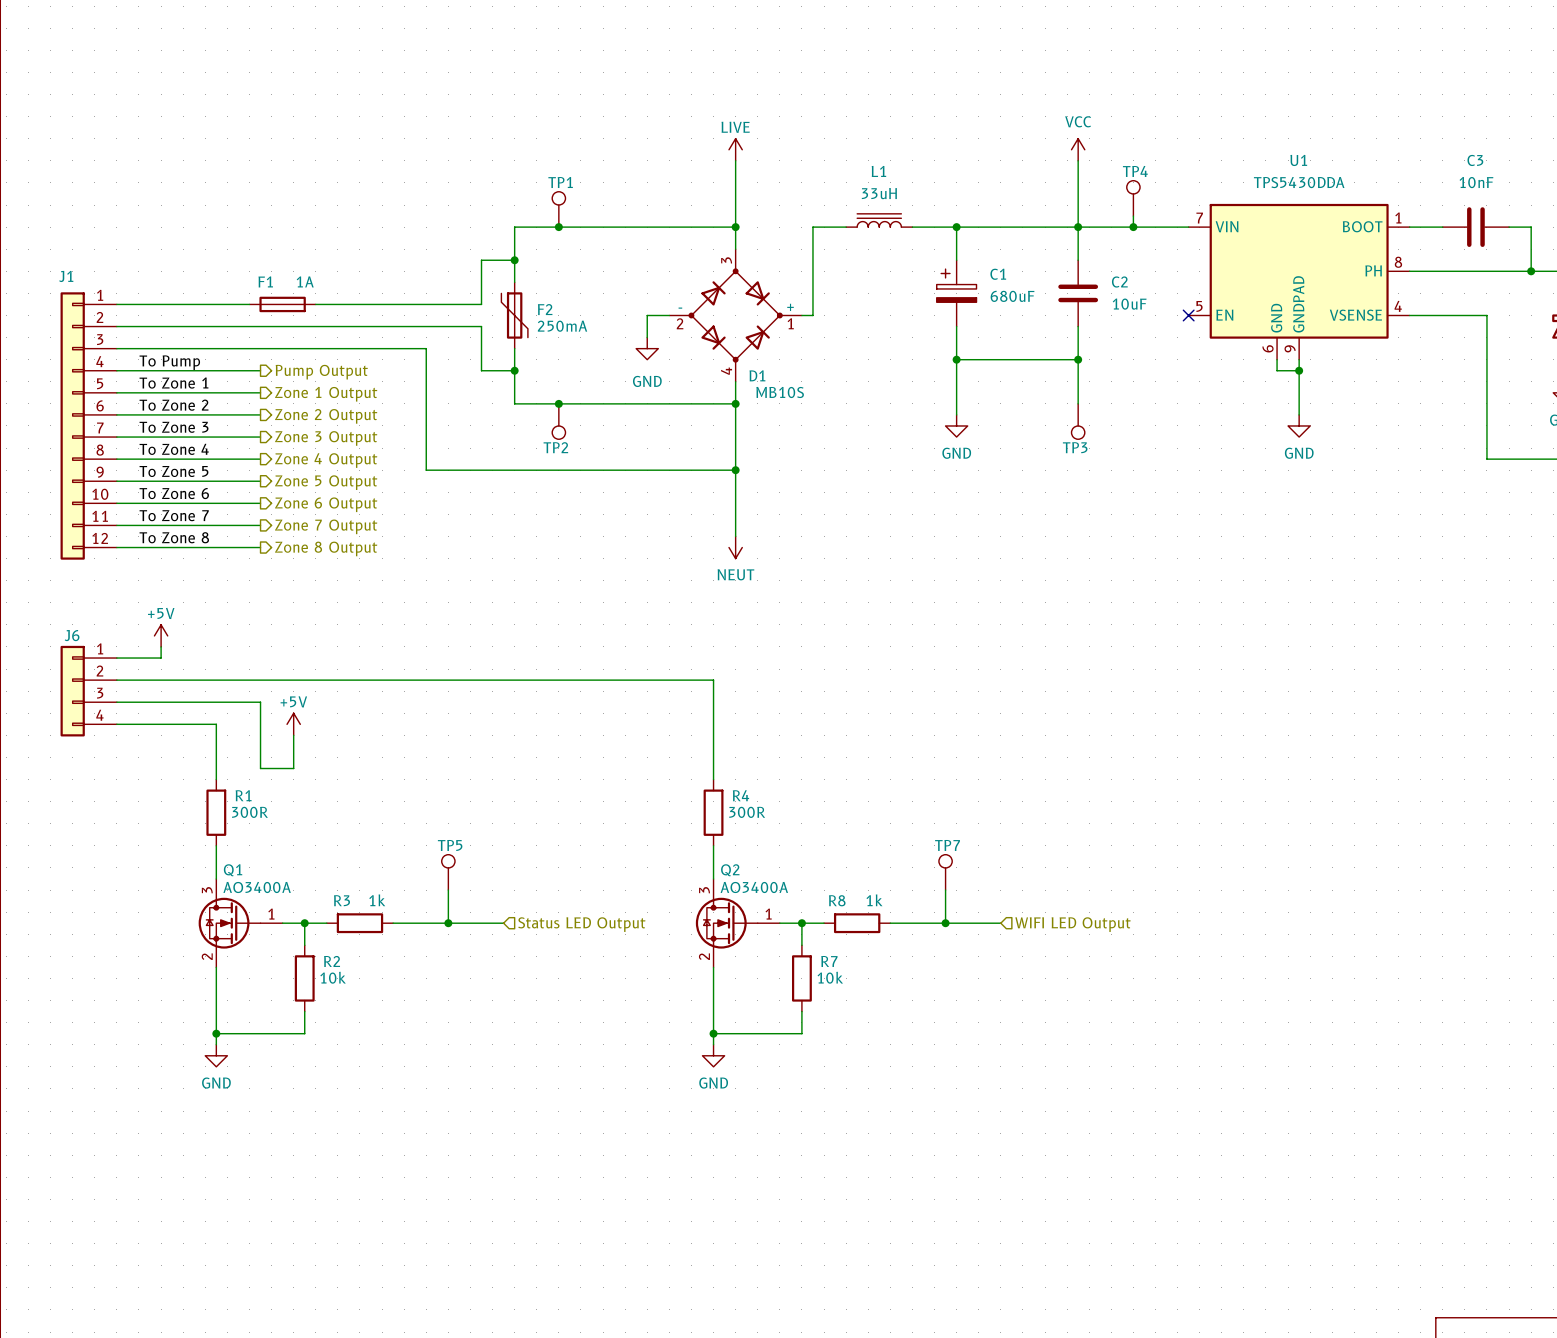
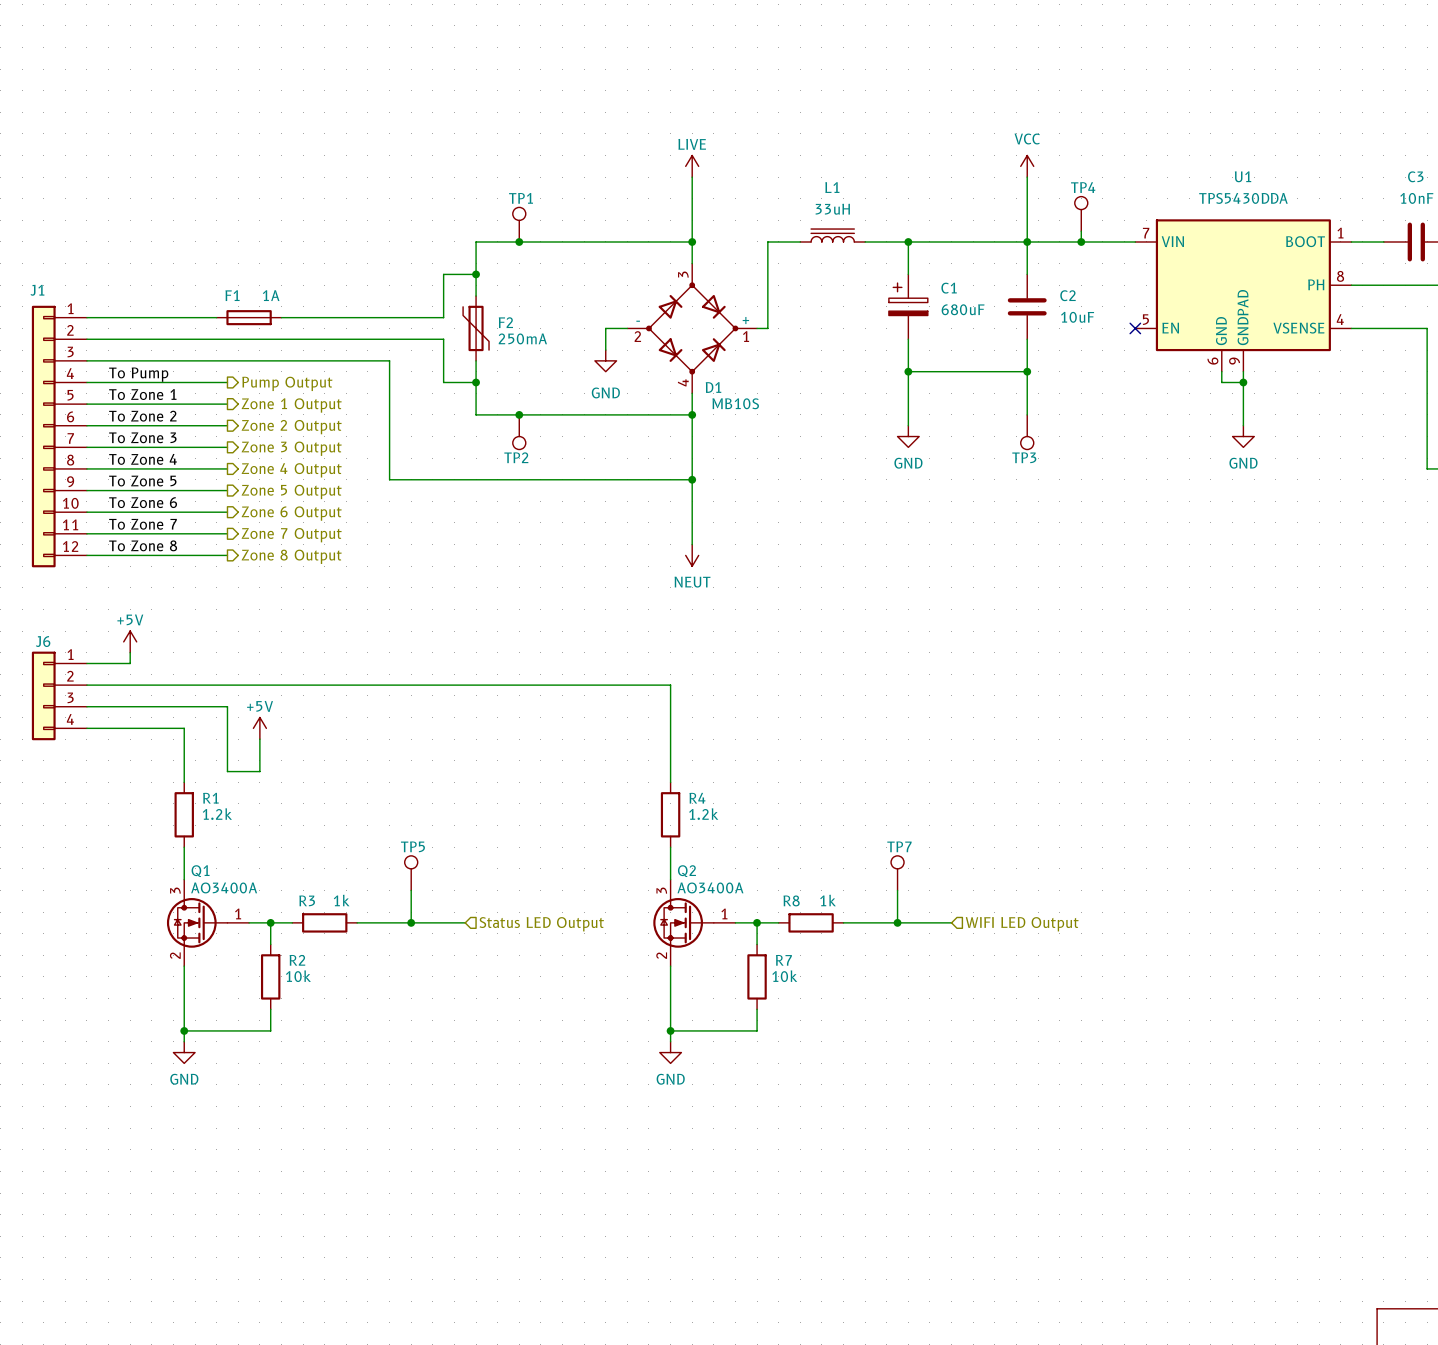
R1 value: 300R (249, 812) -> 1.2k (217, 814)
R4 value: 300R (747, 812) -> 1.2k (703, 814)

